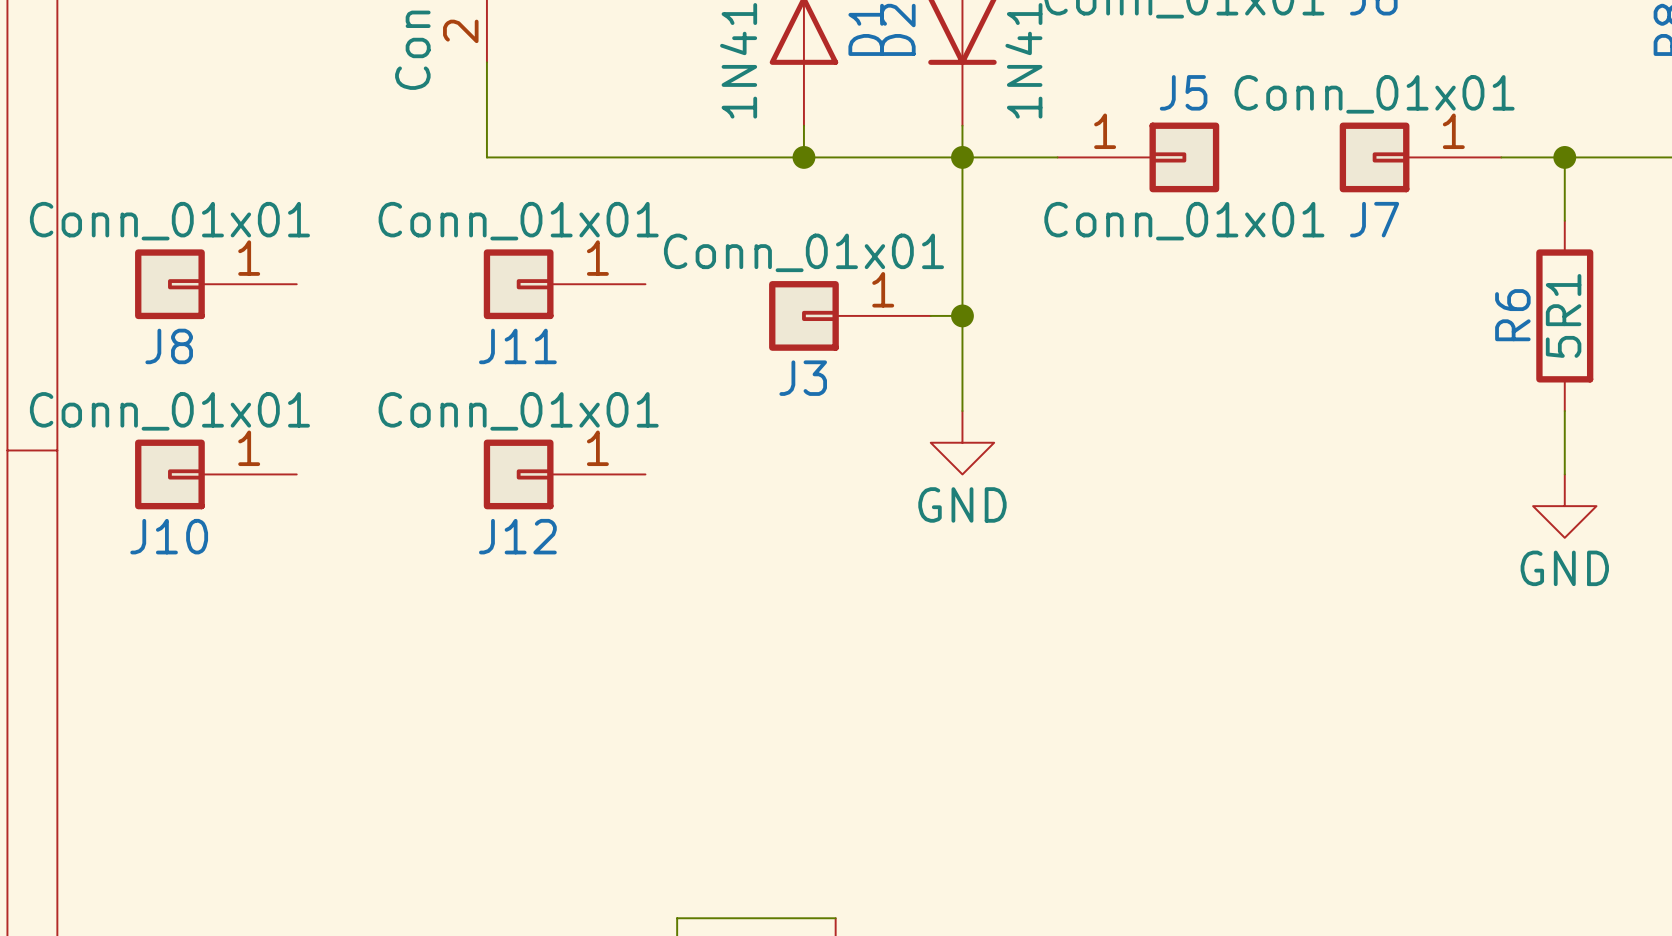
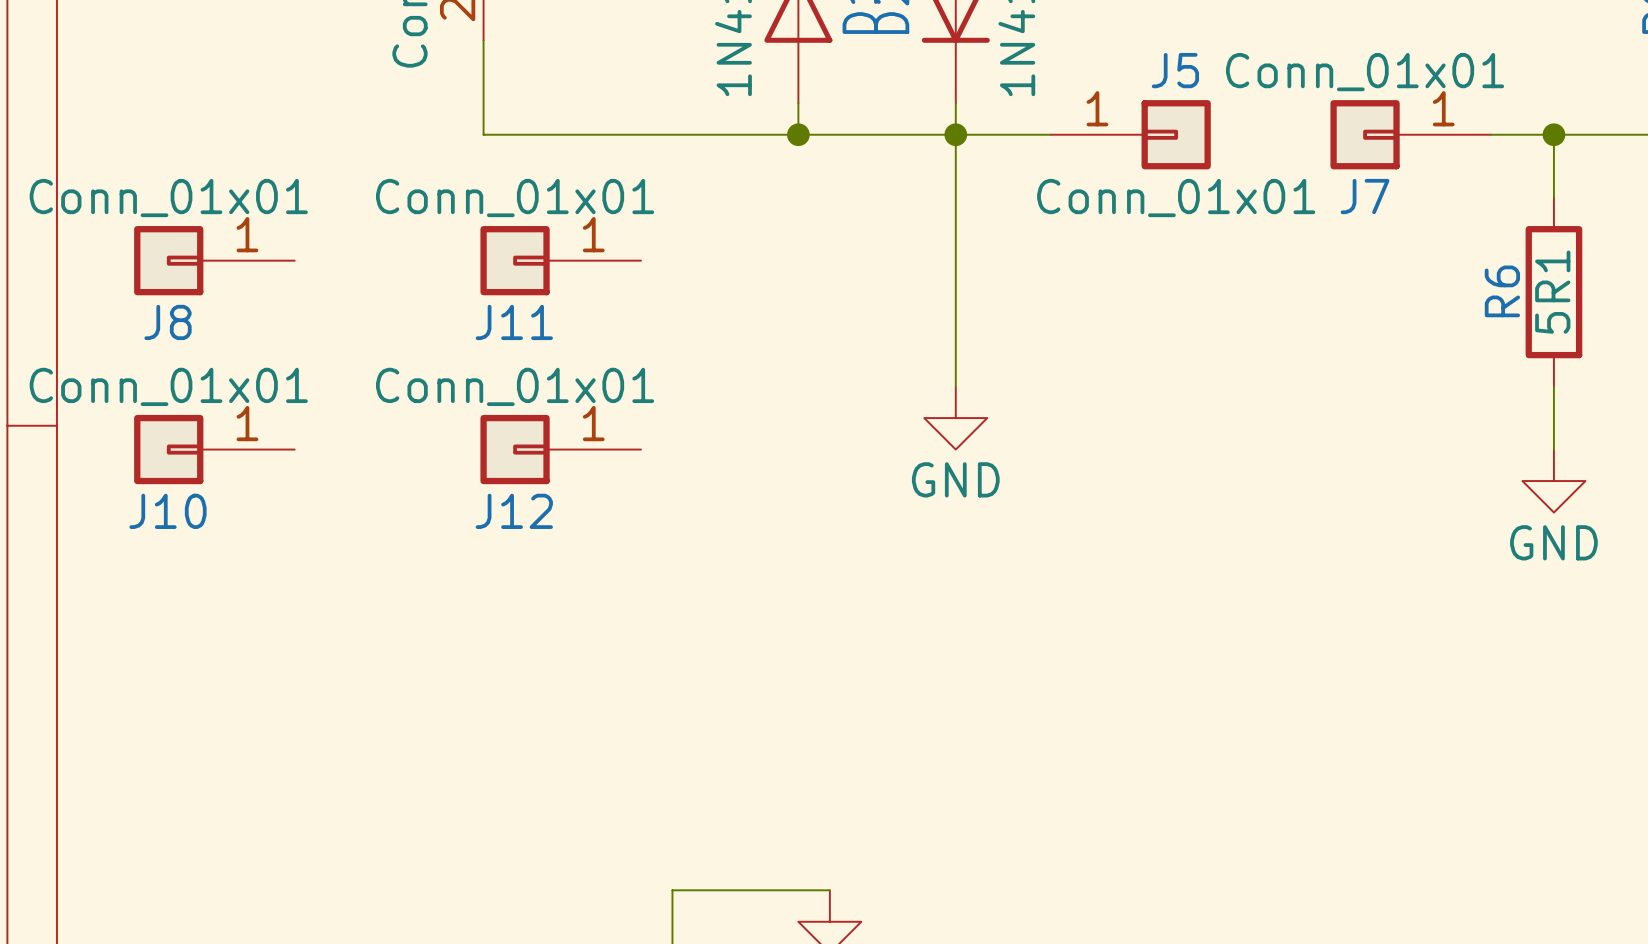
J3: Conn_01x01 (849, 315) -> none
wire: (930, 315) (962, 315) -> none
junction: (962, 315) -> none

